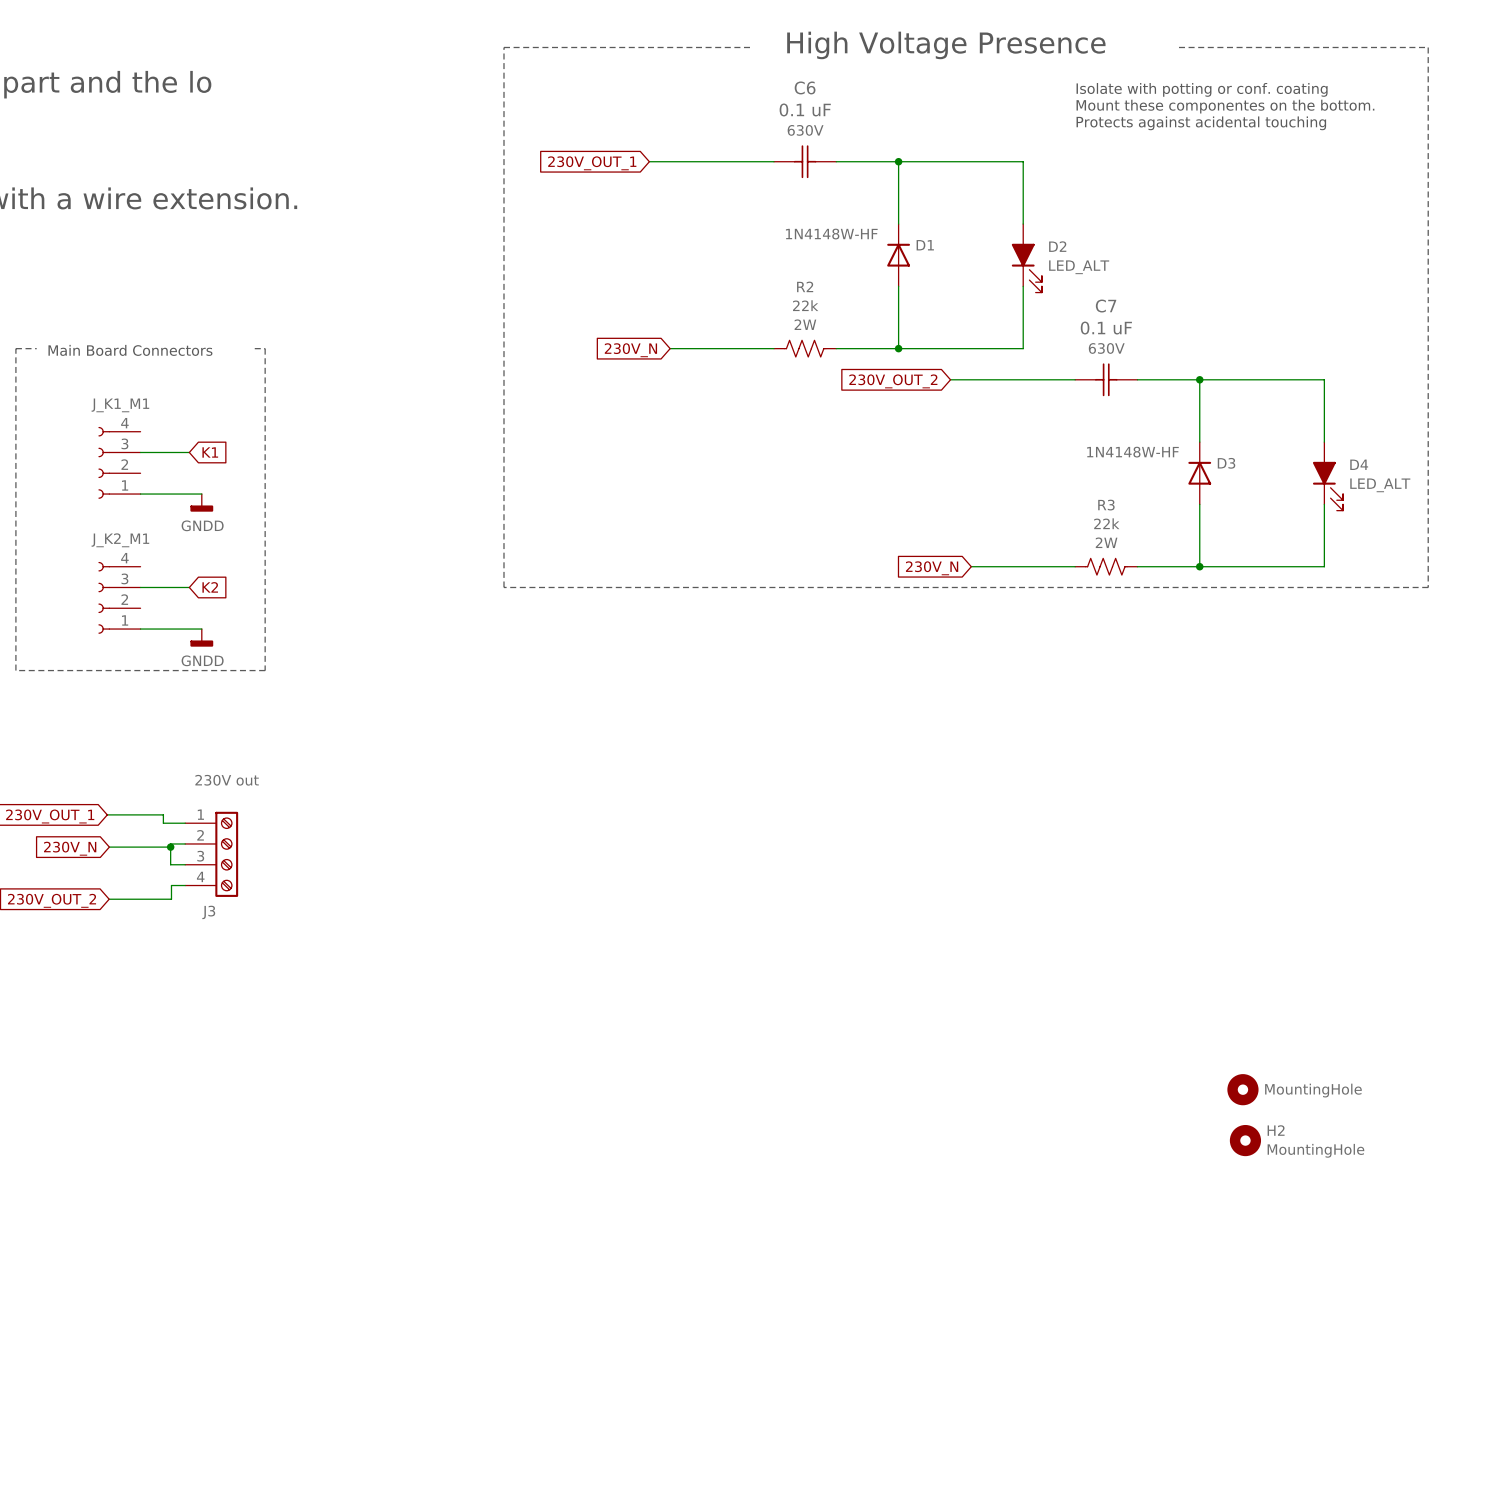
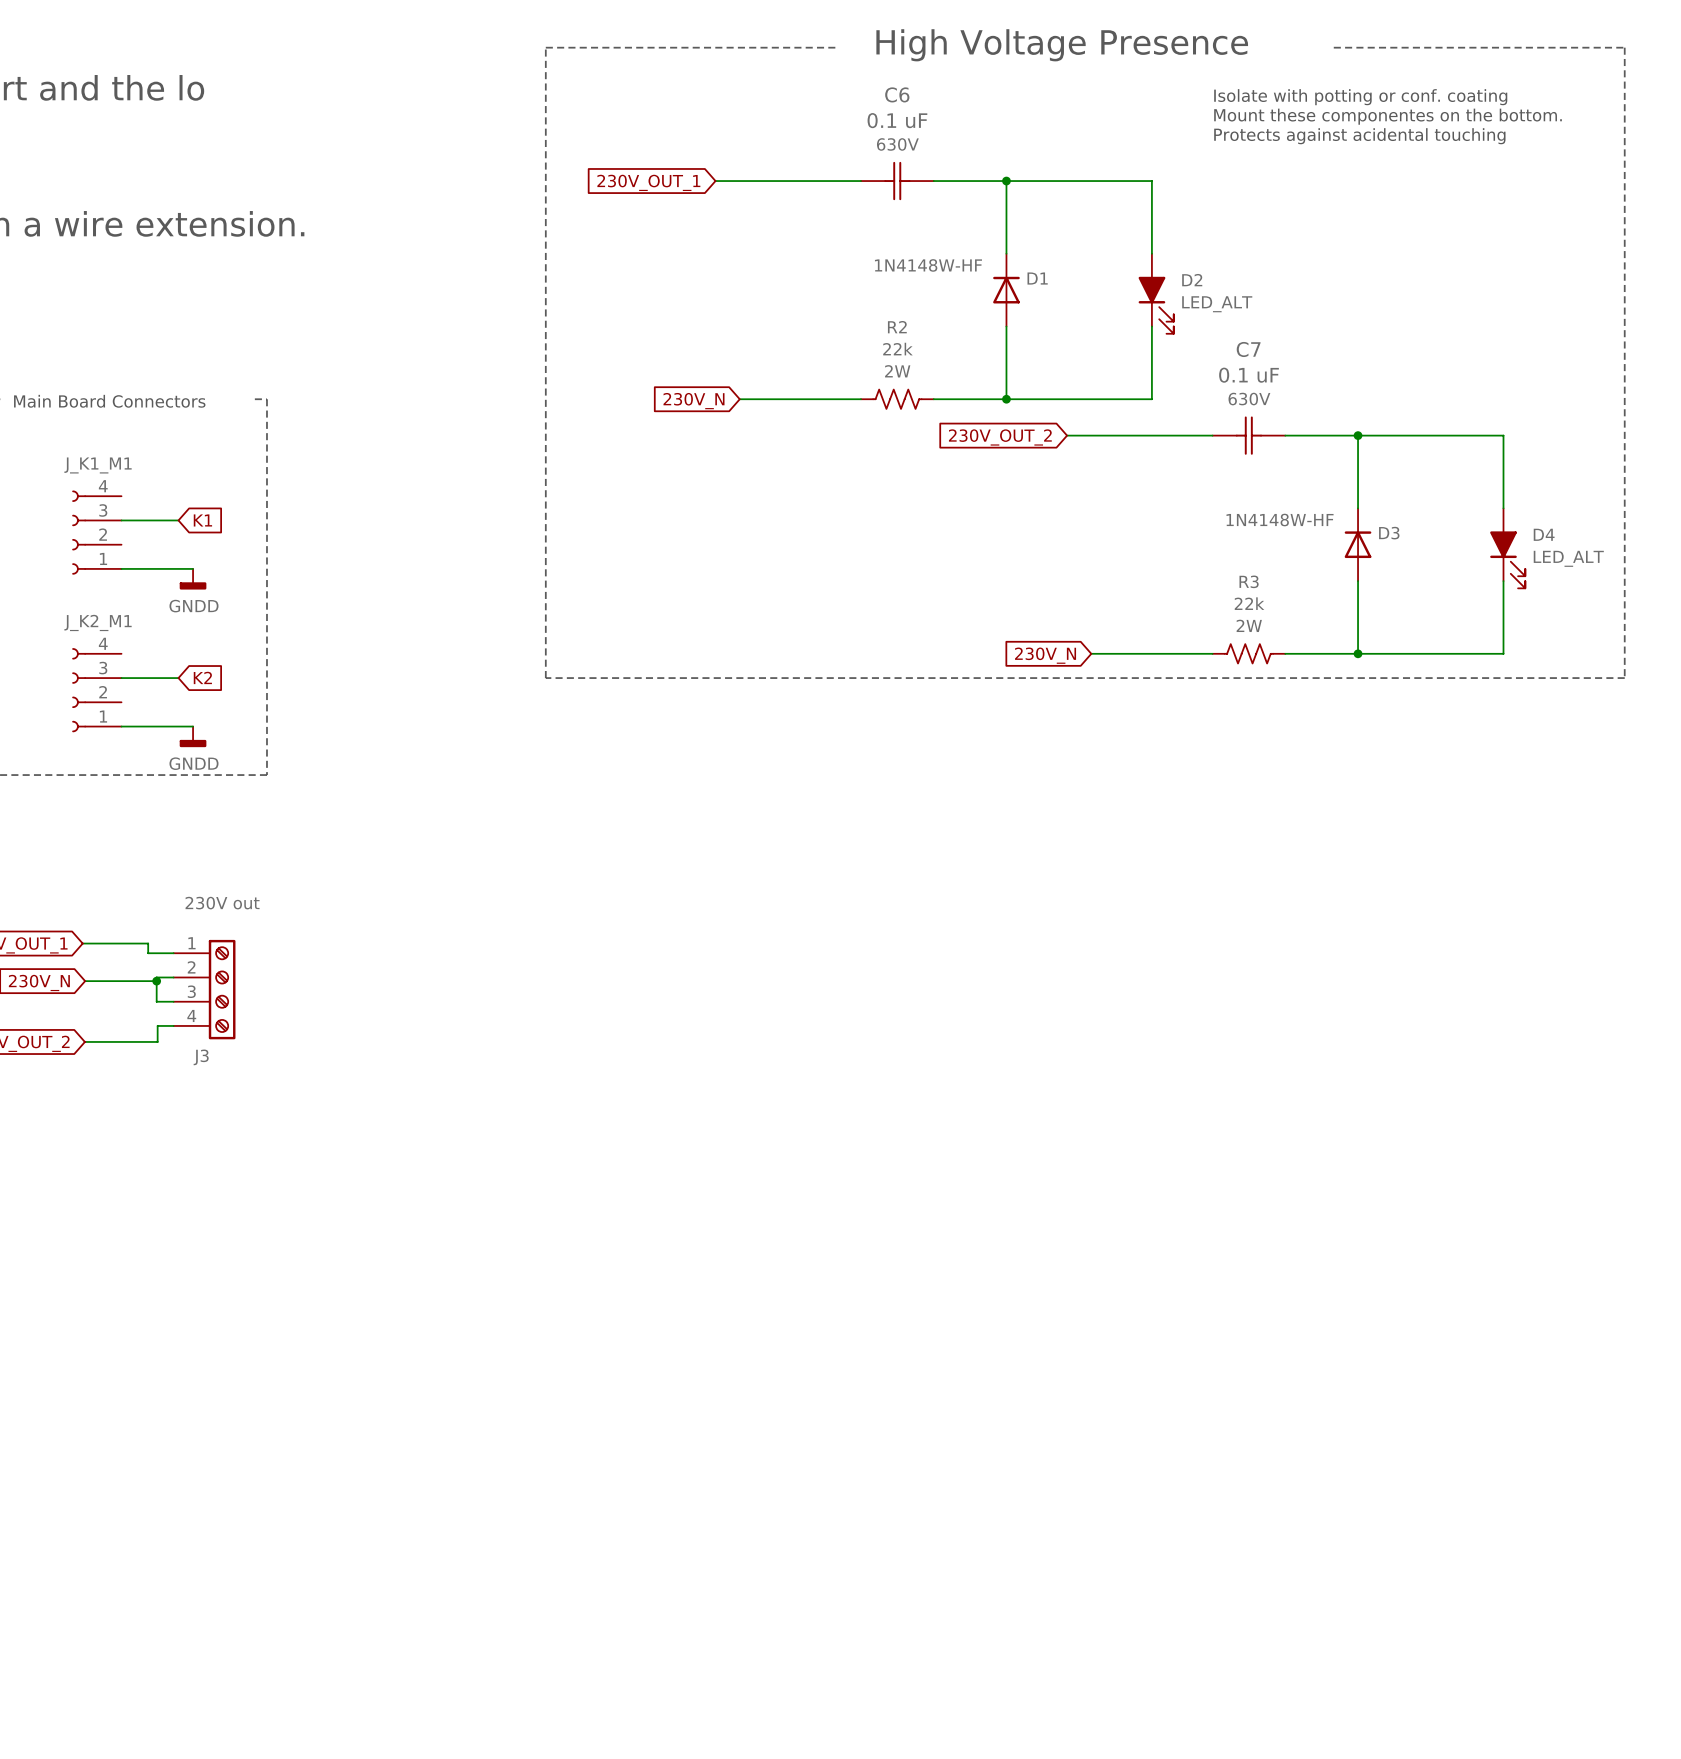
part: MountingHole (1242, 1089) -> none
H2: MountingHole (1245, 1140) -> none

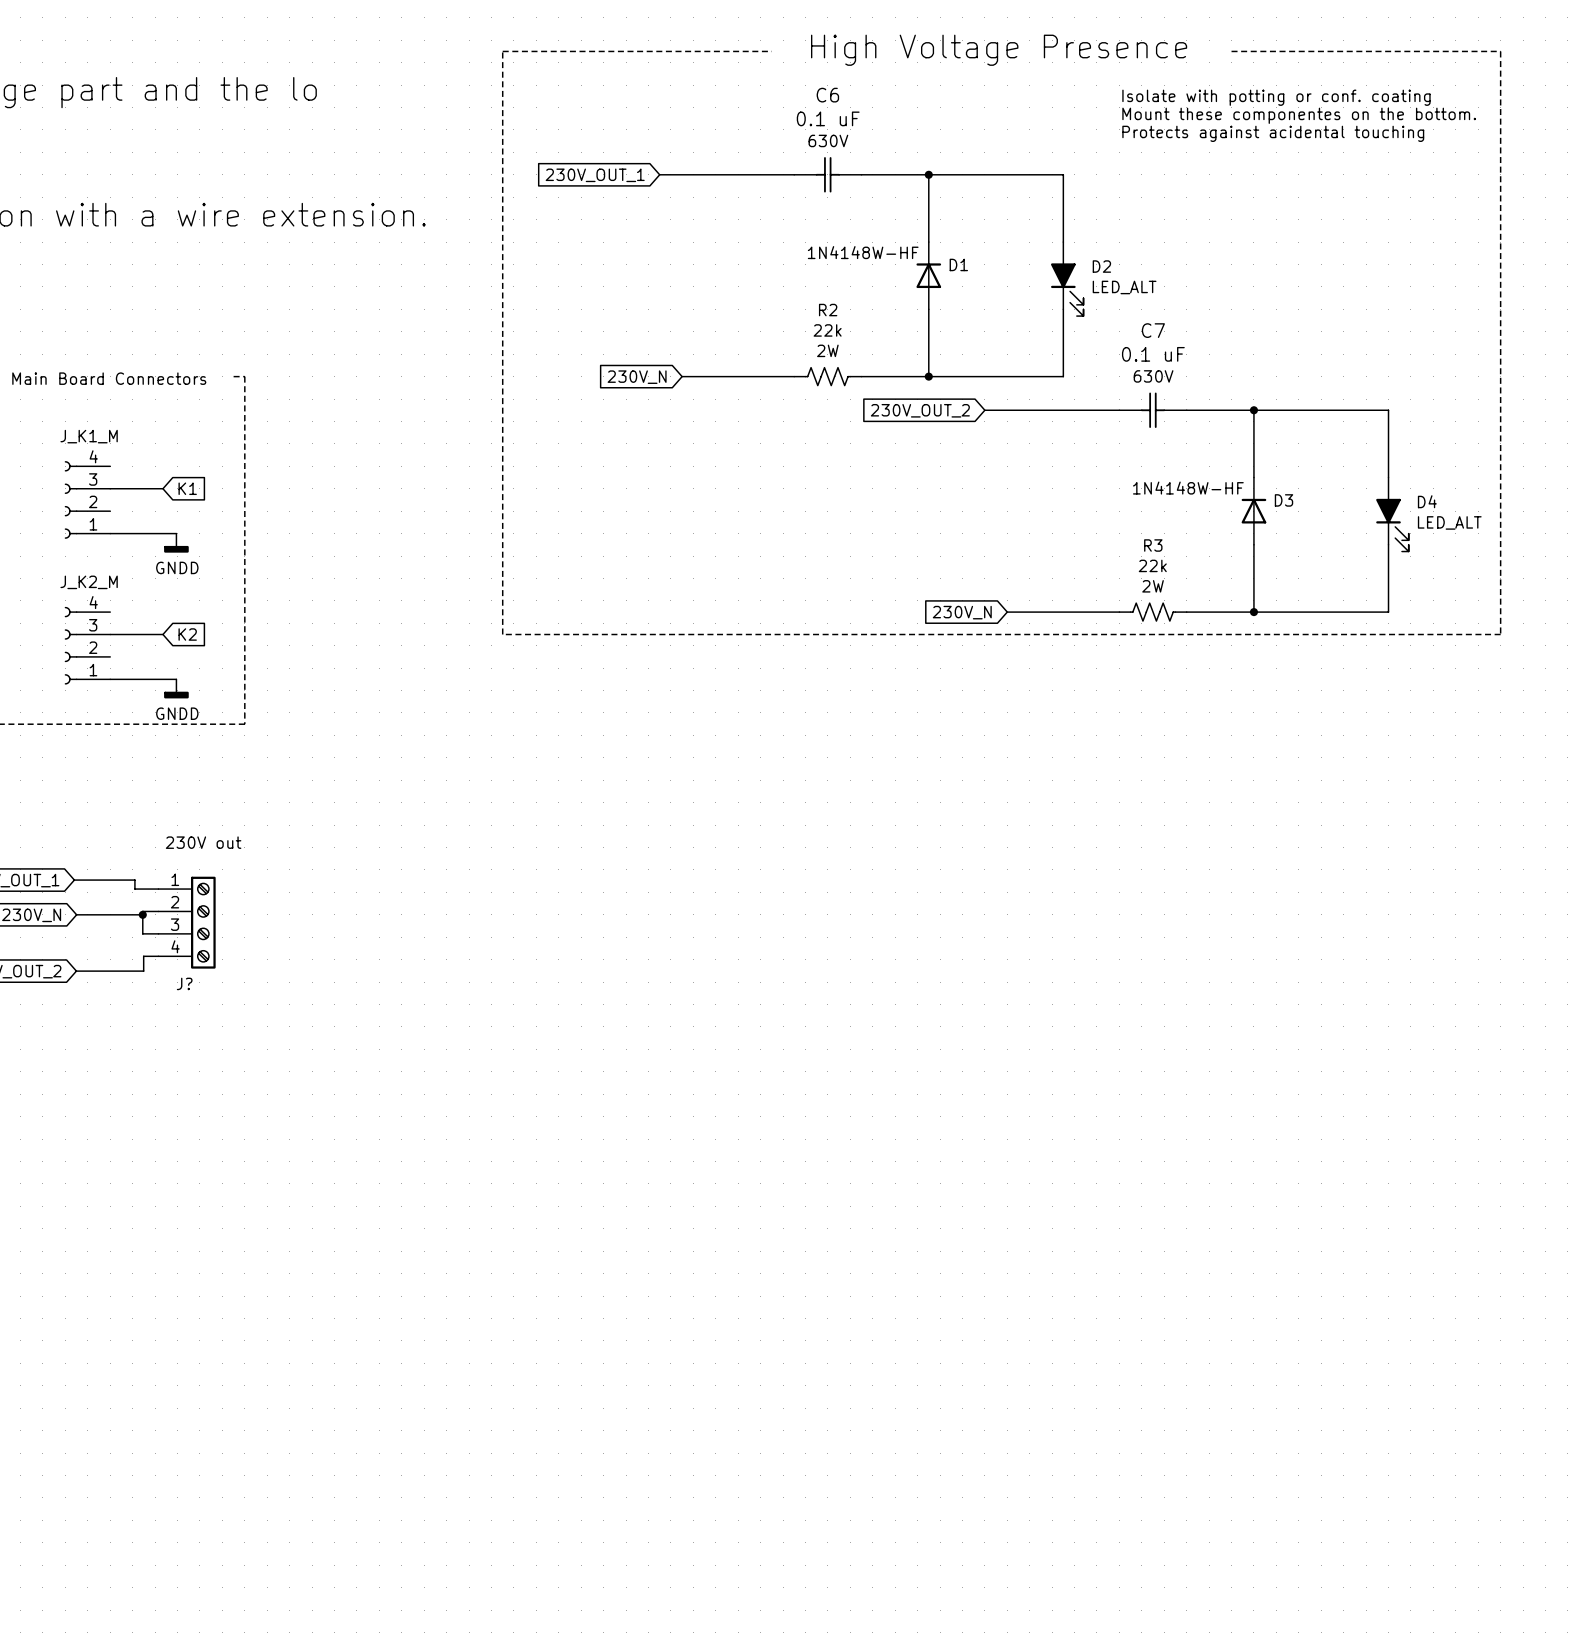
J_K1_M1 name: J_K1_M1 (98, 465) -> J_K1_M (89, 436)
J_K2_M1 name: J_K2_M1 (98, 622) -> J_K2_M (89, 582)
J3 name: J3 (201, 1057) -> J? (184, 983)

